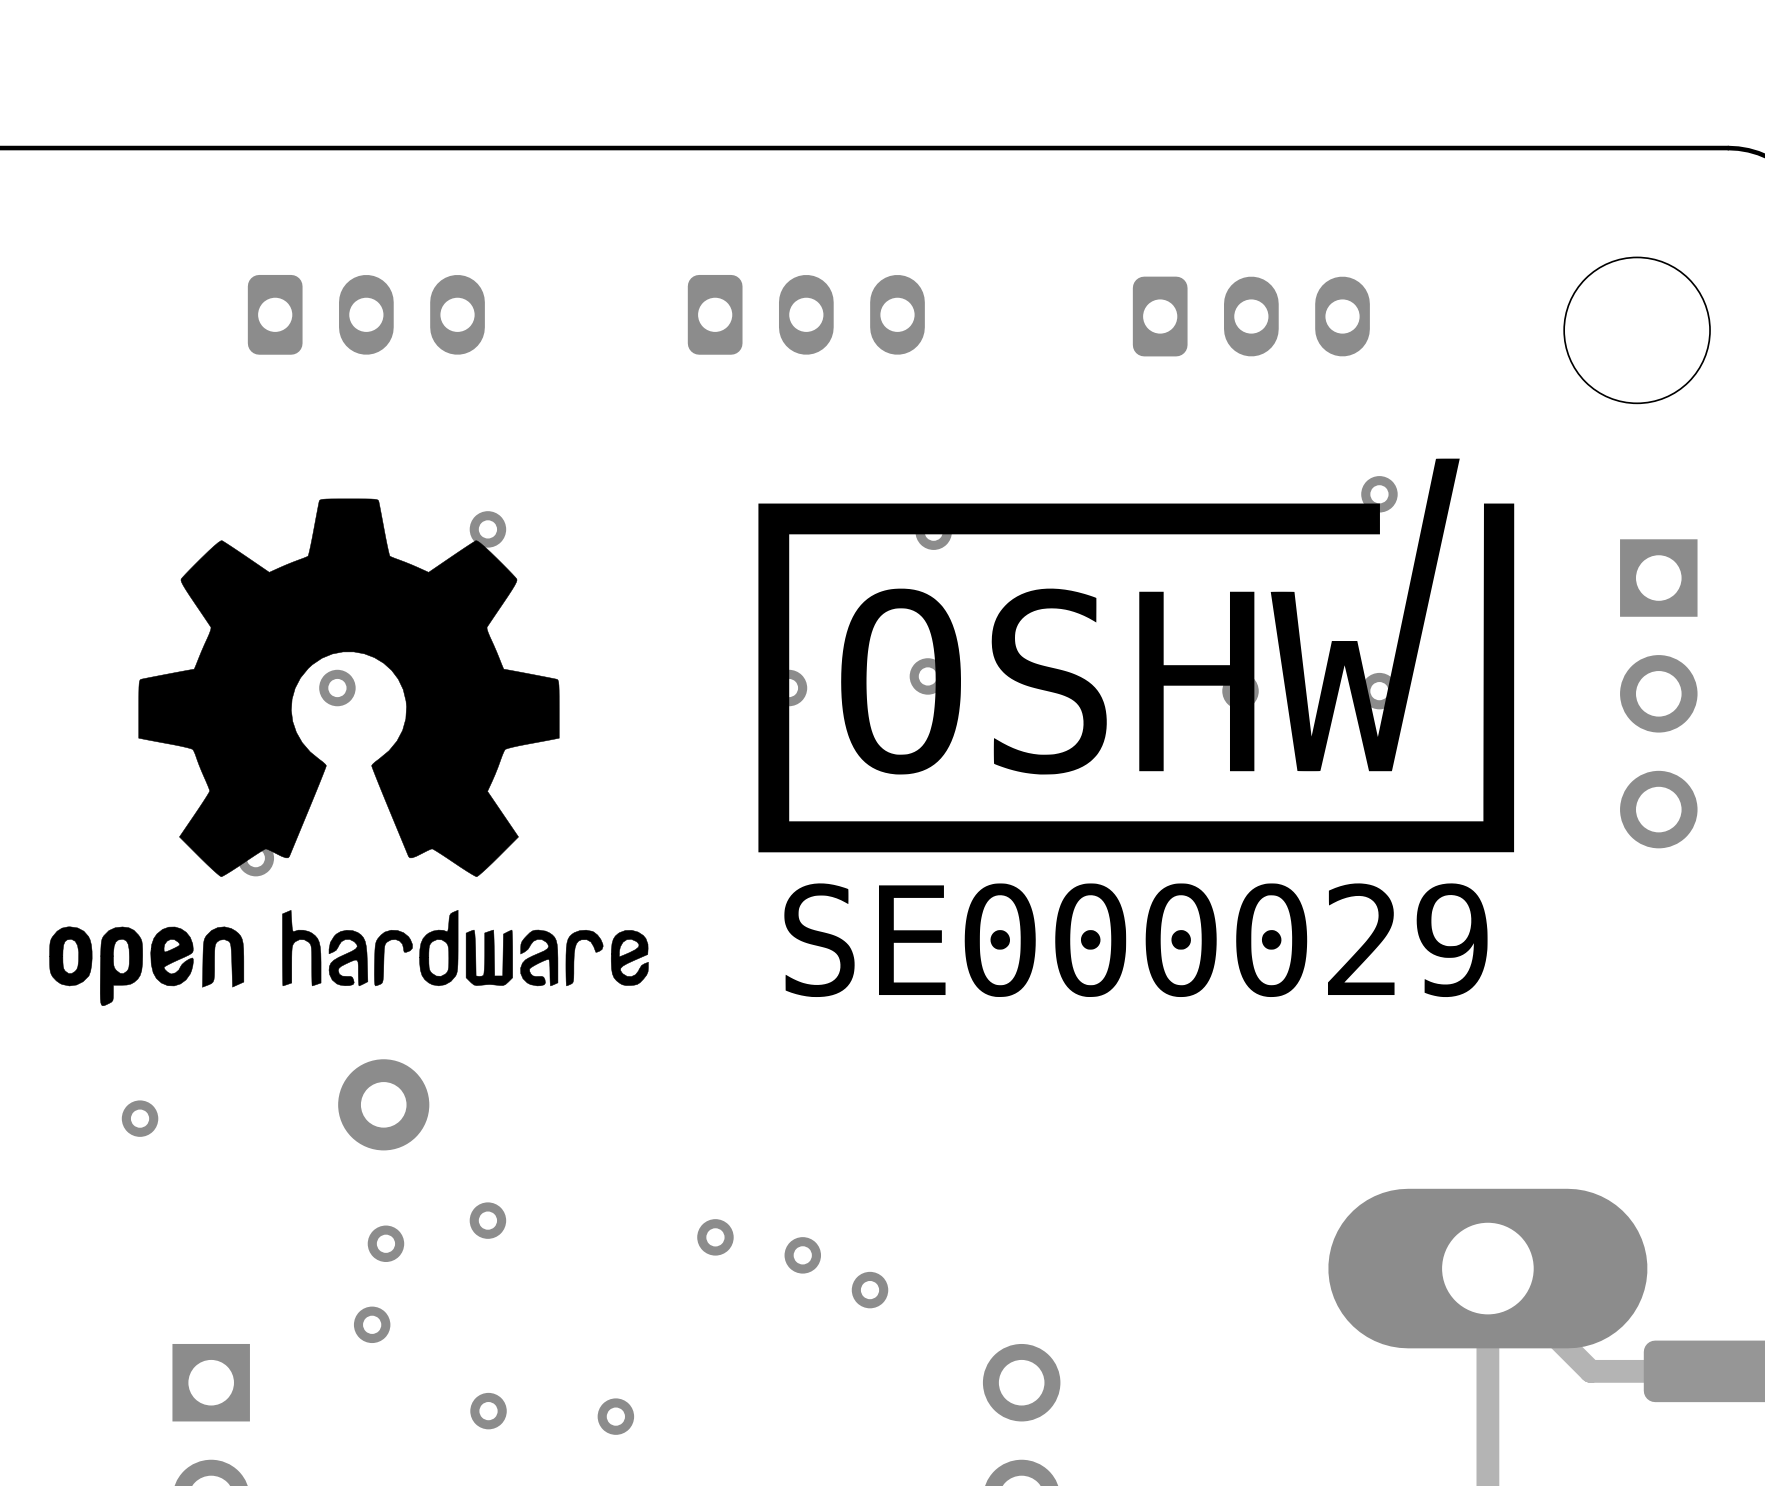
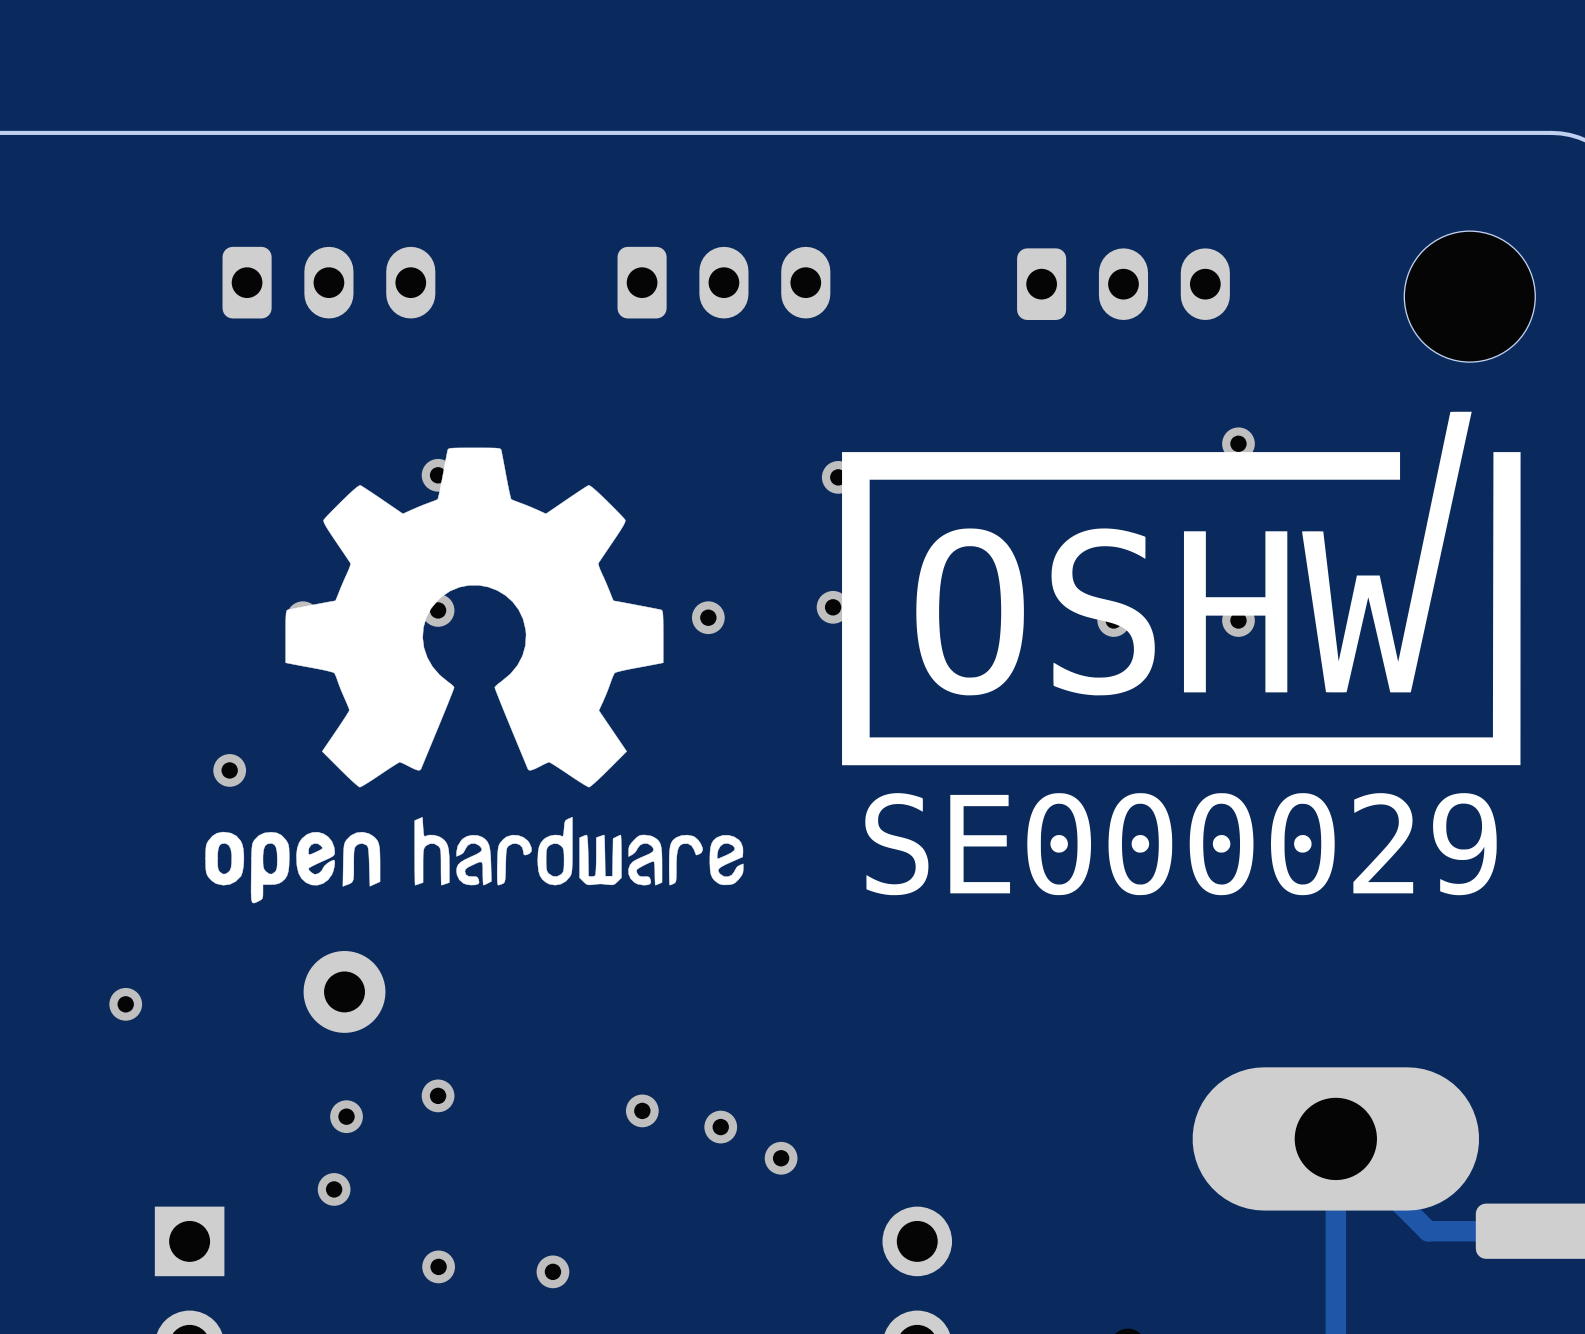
part: (1658, 693) -> none
drawing position: (1136, 727) -> (1181, 653)
drawing position: (349, 752) -> (474, 675)

